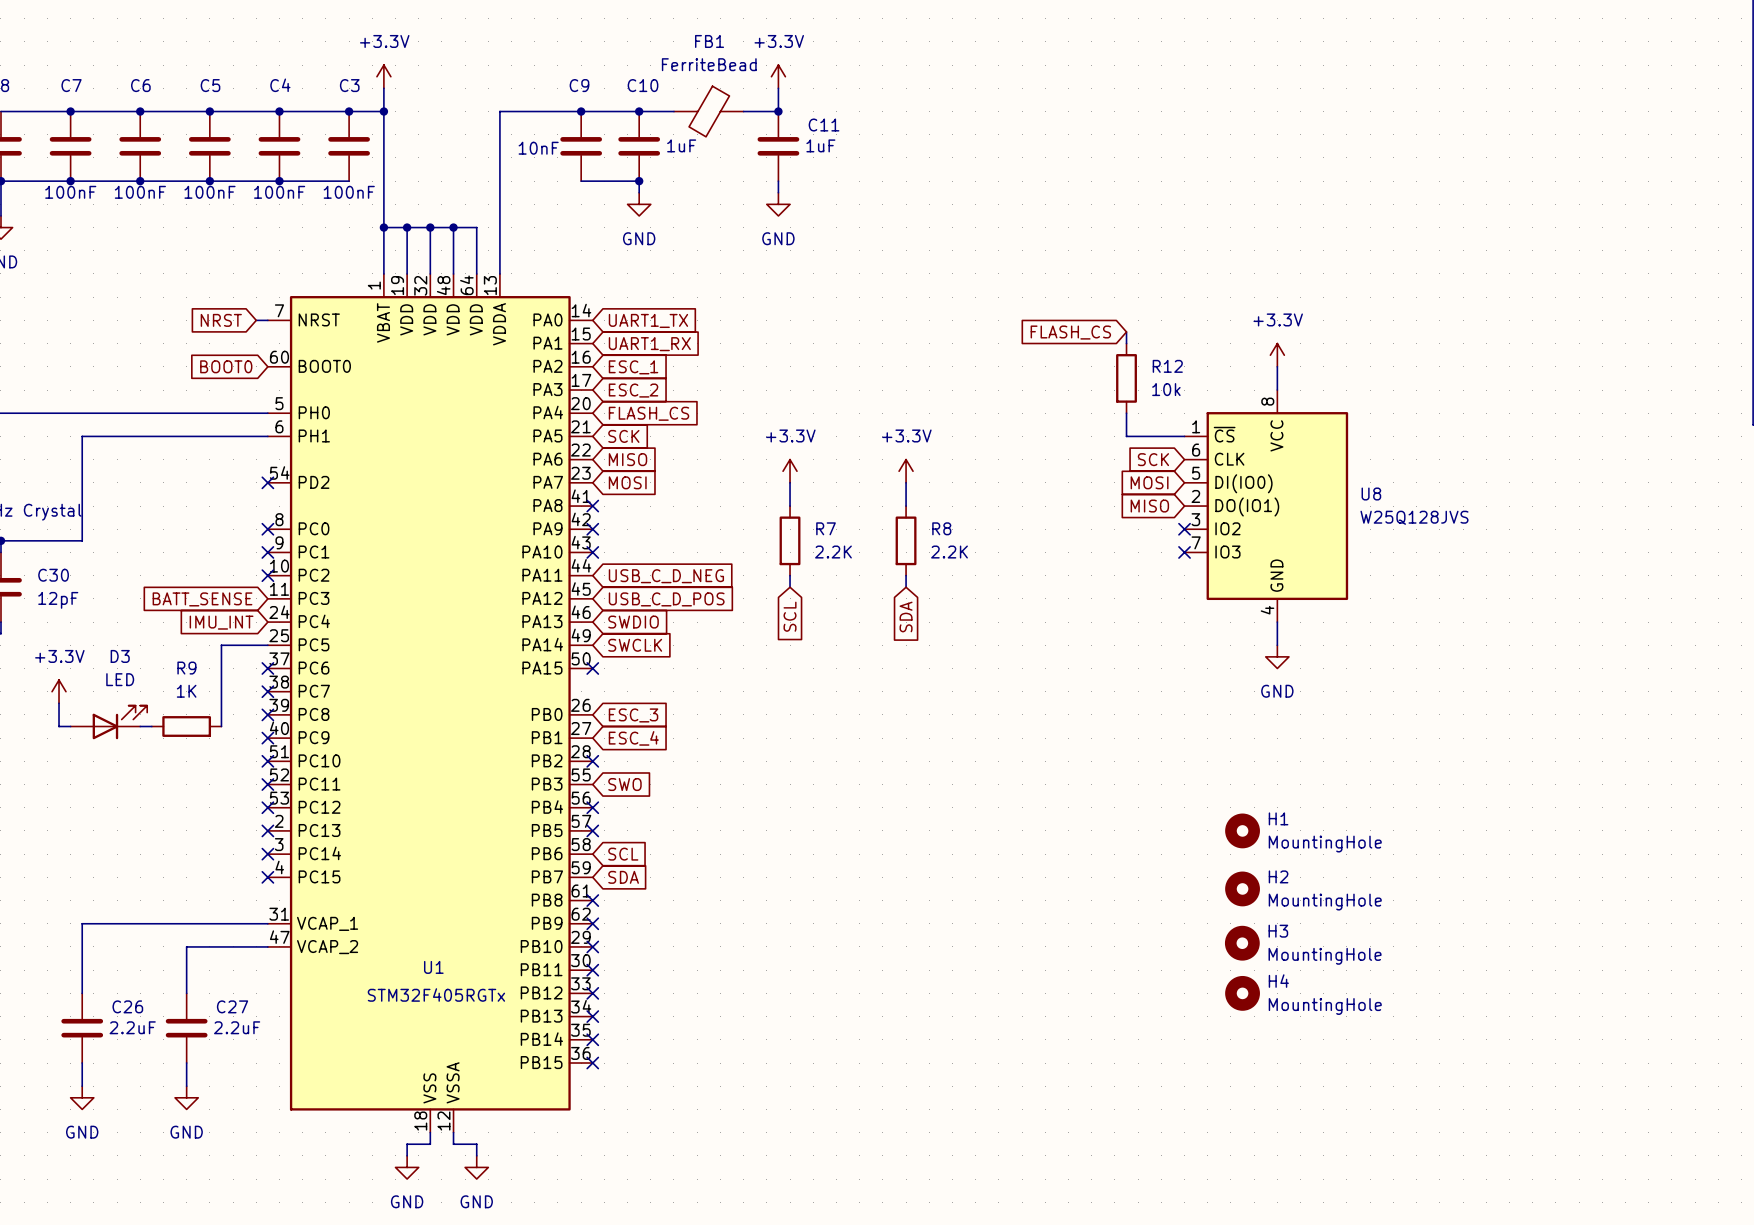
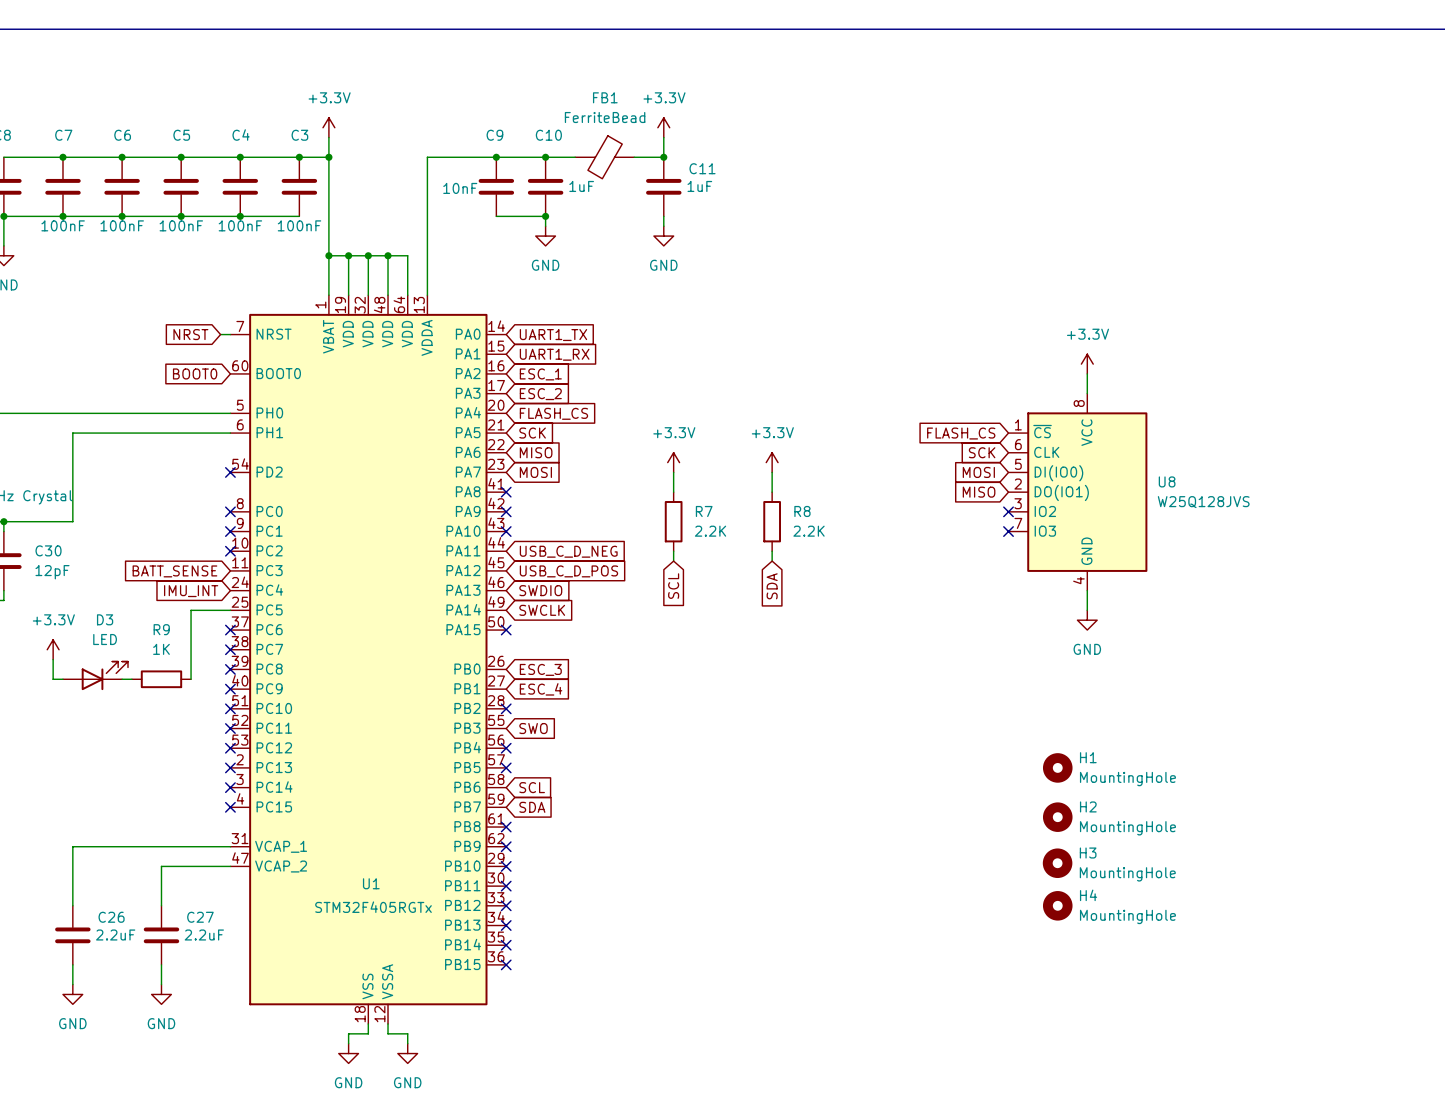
wire: (1126, 331) (1126, 343) -> none
global label position: FLASH_CS (1070, 332) -> FLASH_CS (961, 433)
R12: 10k (1126, 378) -> none
wire: (1126, 413) (1126, 436) (1184, 436) -> none

